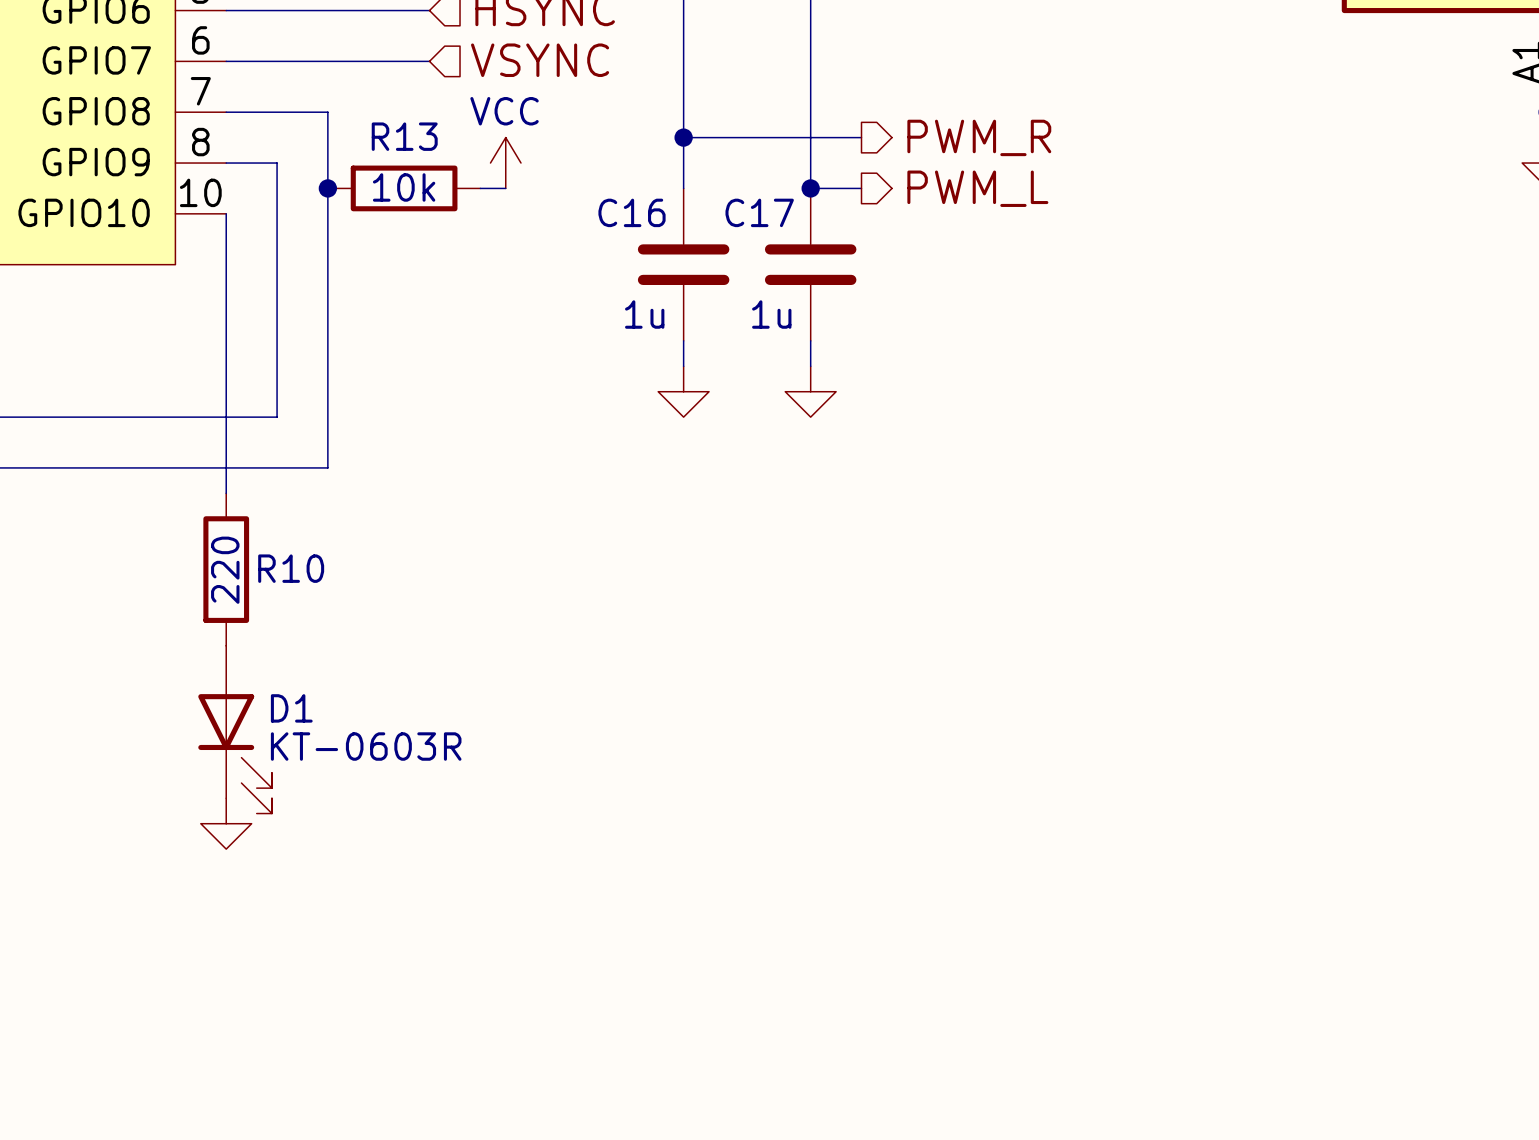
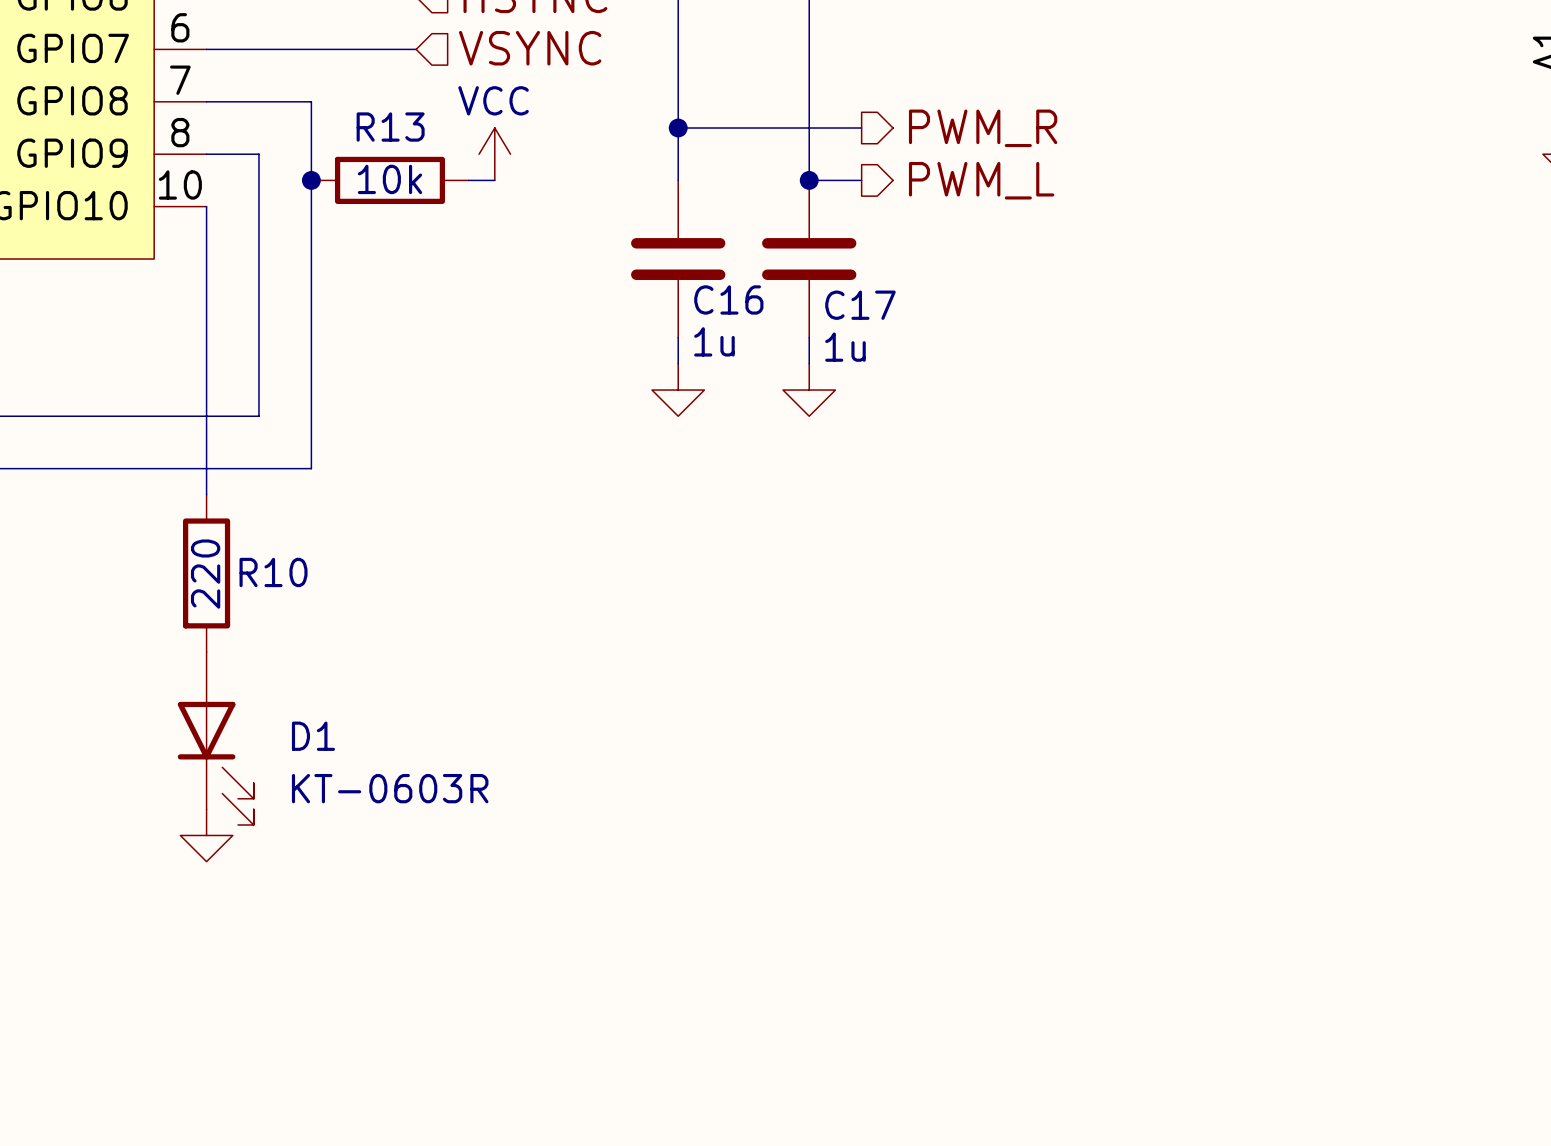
C16 name position: C16 (632, 212) -> C16 (728, 299)
C17 name position: C17 (759, 212) -> C17 (860, 305)
C16 value position: 1u (644, 314) -> 1u (714, 341)
C17 value position: 1u (771, 314) -> 1u (845, 347)
D1 name position: D1 (291, 708) -> D1 (313, 736)
D1 value position: KT-0603R (366, 746) -> KT-0603R (390, 788)

